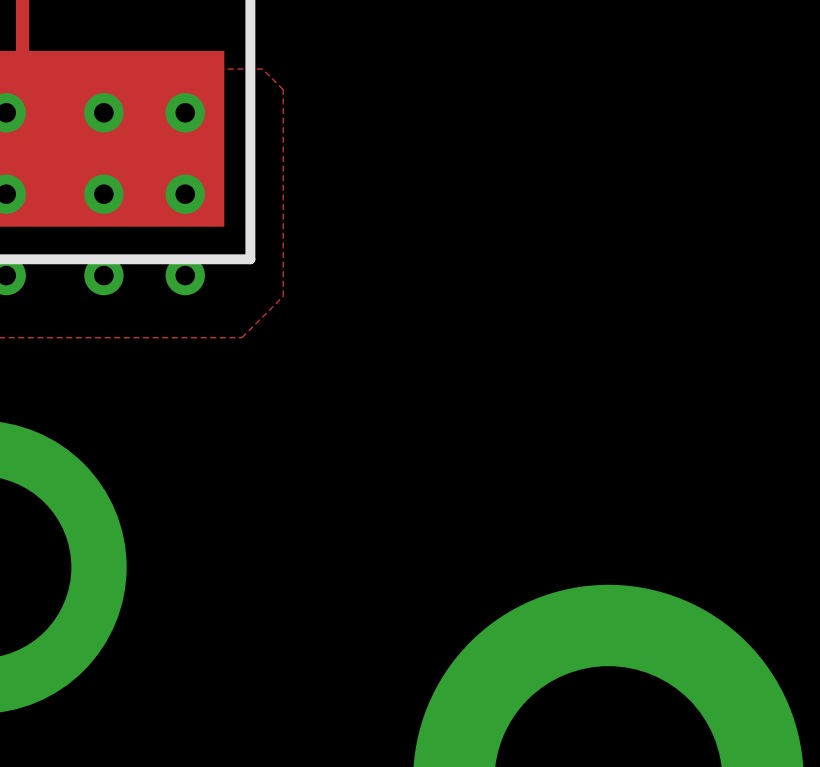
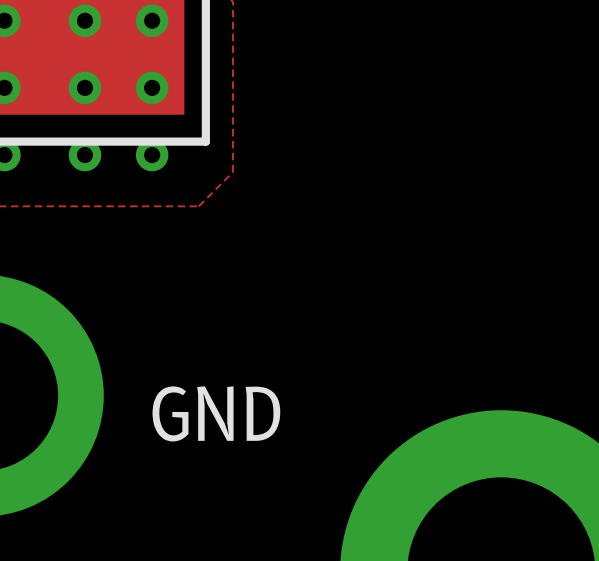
text: none -> GND (216, 413)

